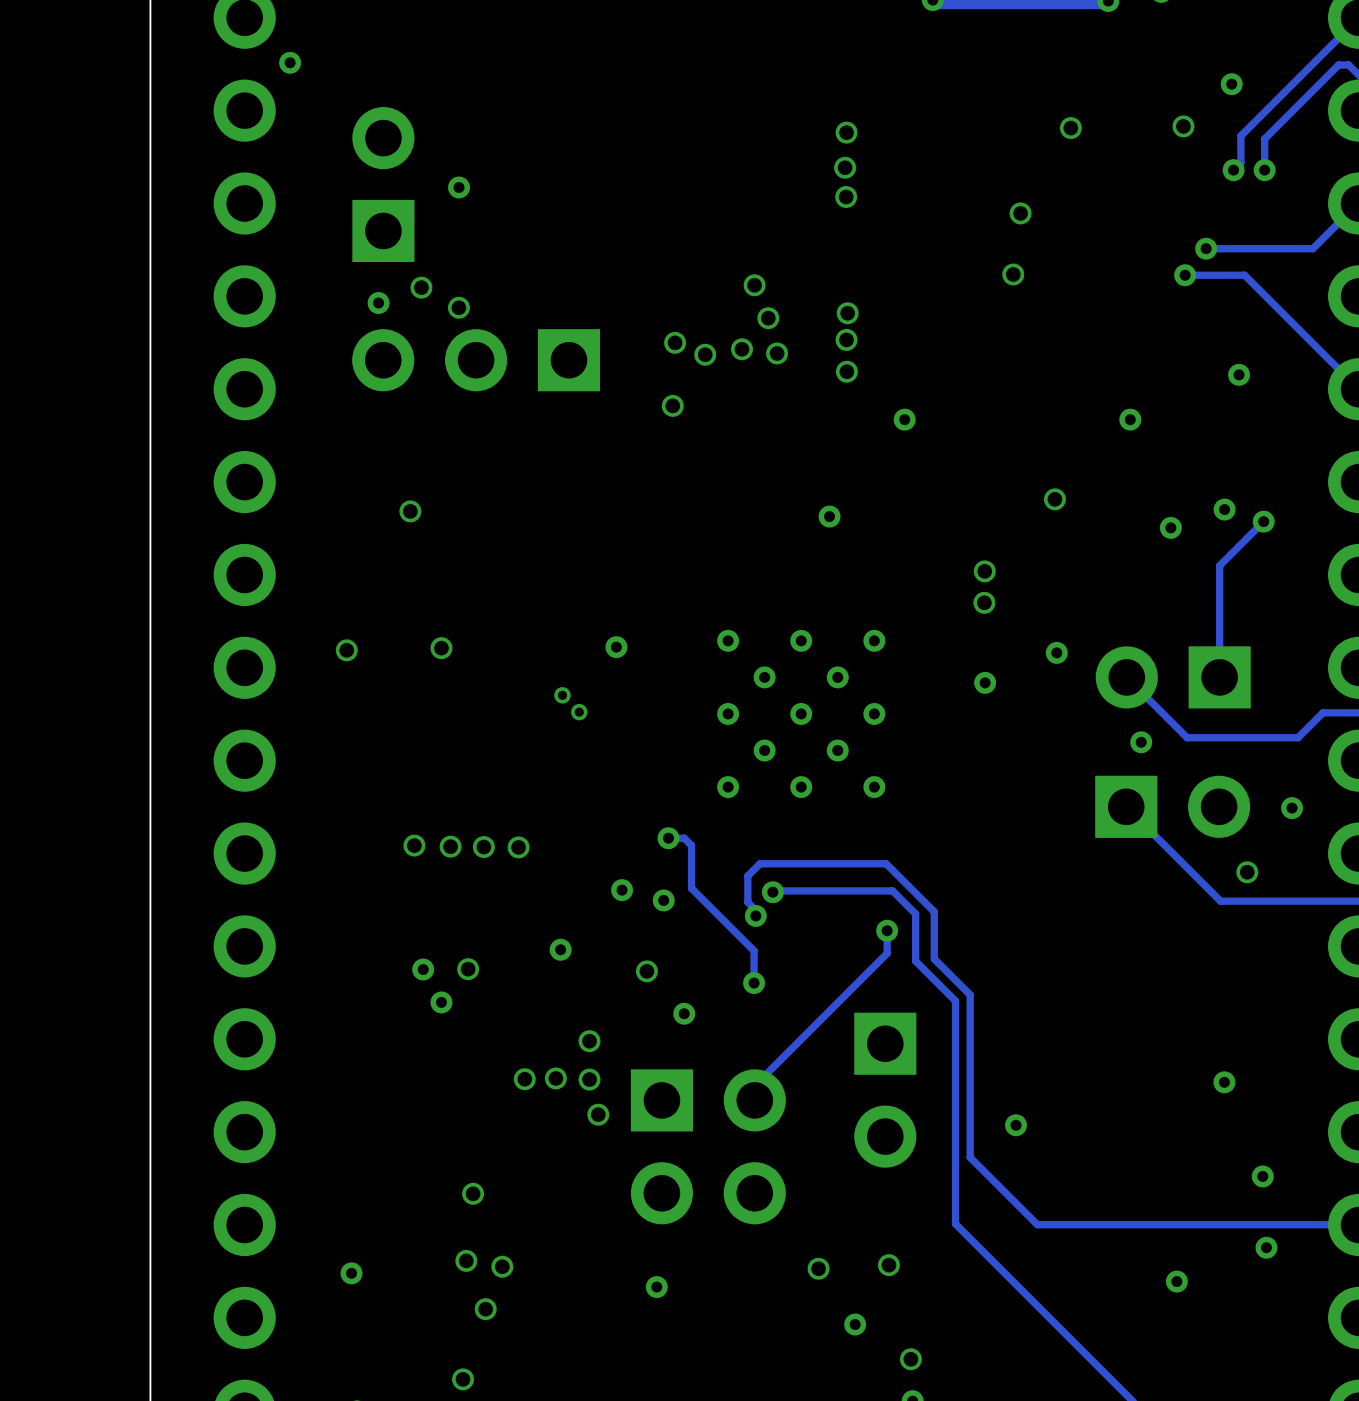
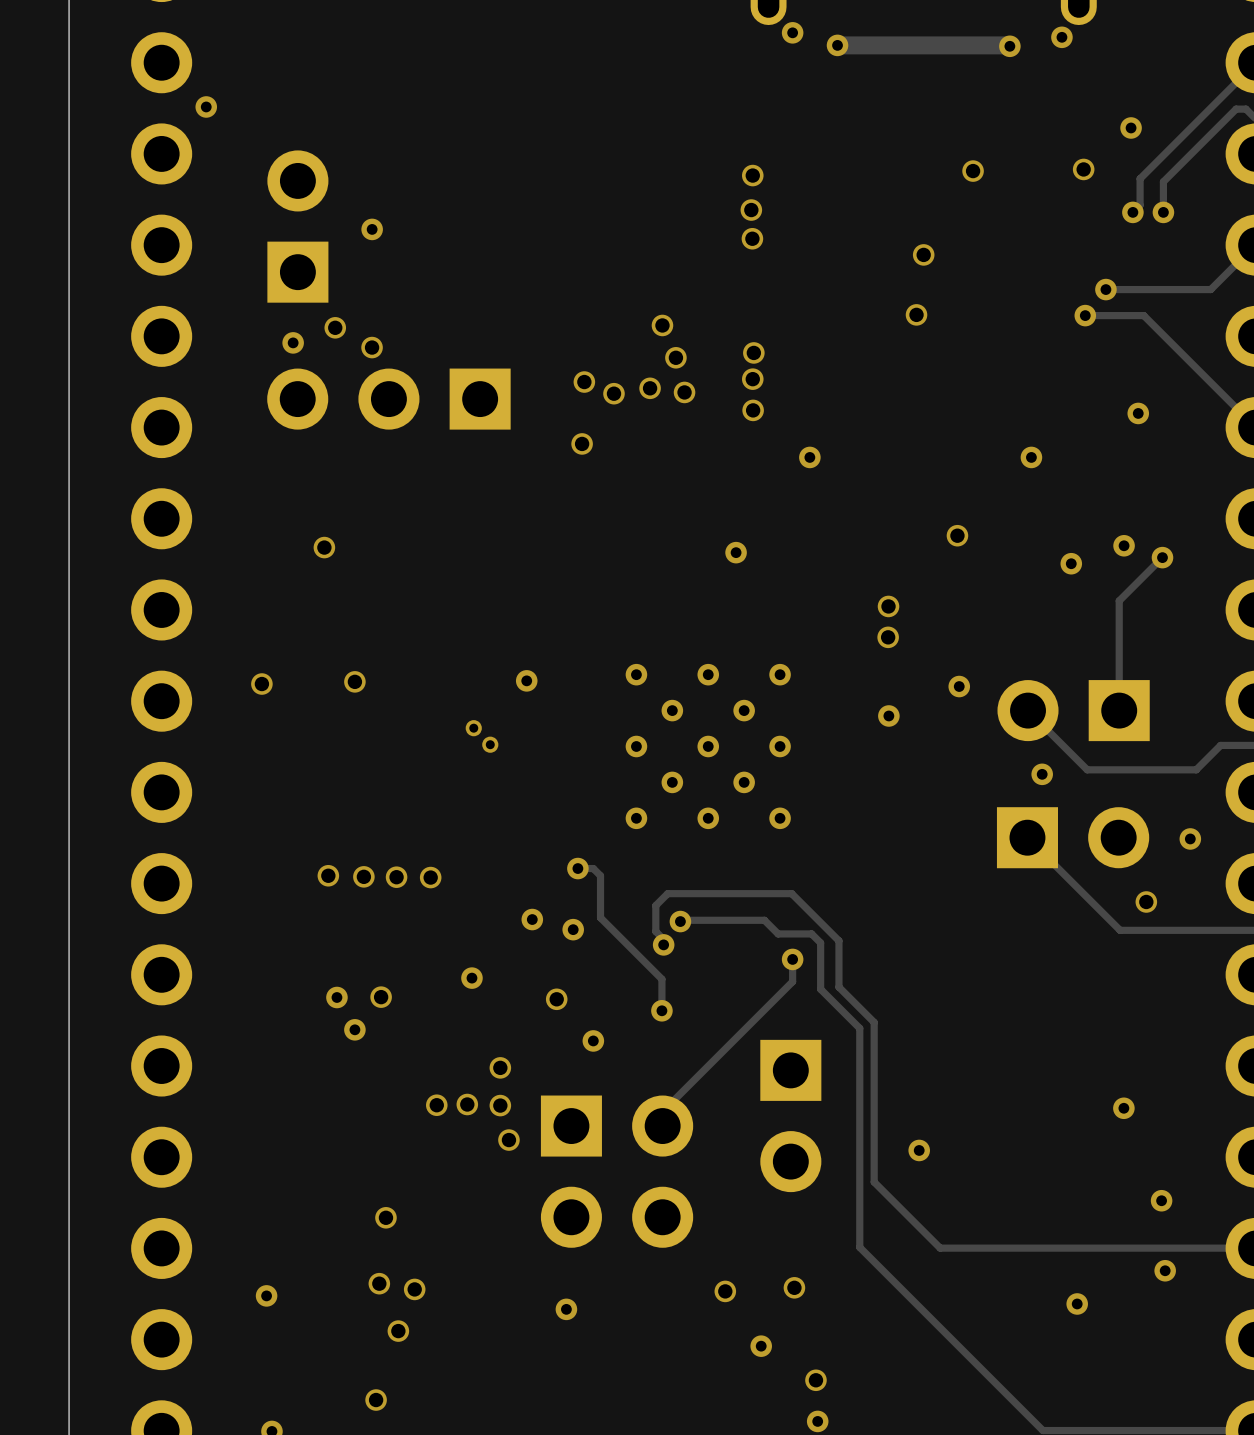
track: (858, 890) (892, 890) (906, 904) -> (764, 920) (778, 933) (811, 933)

